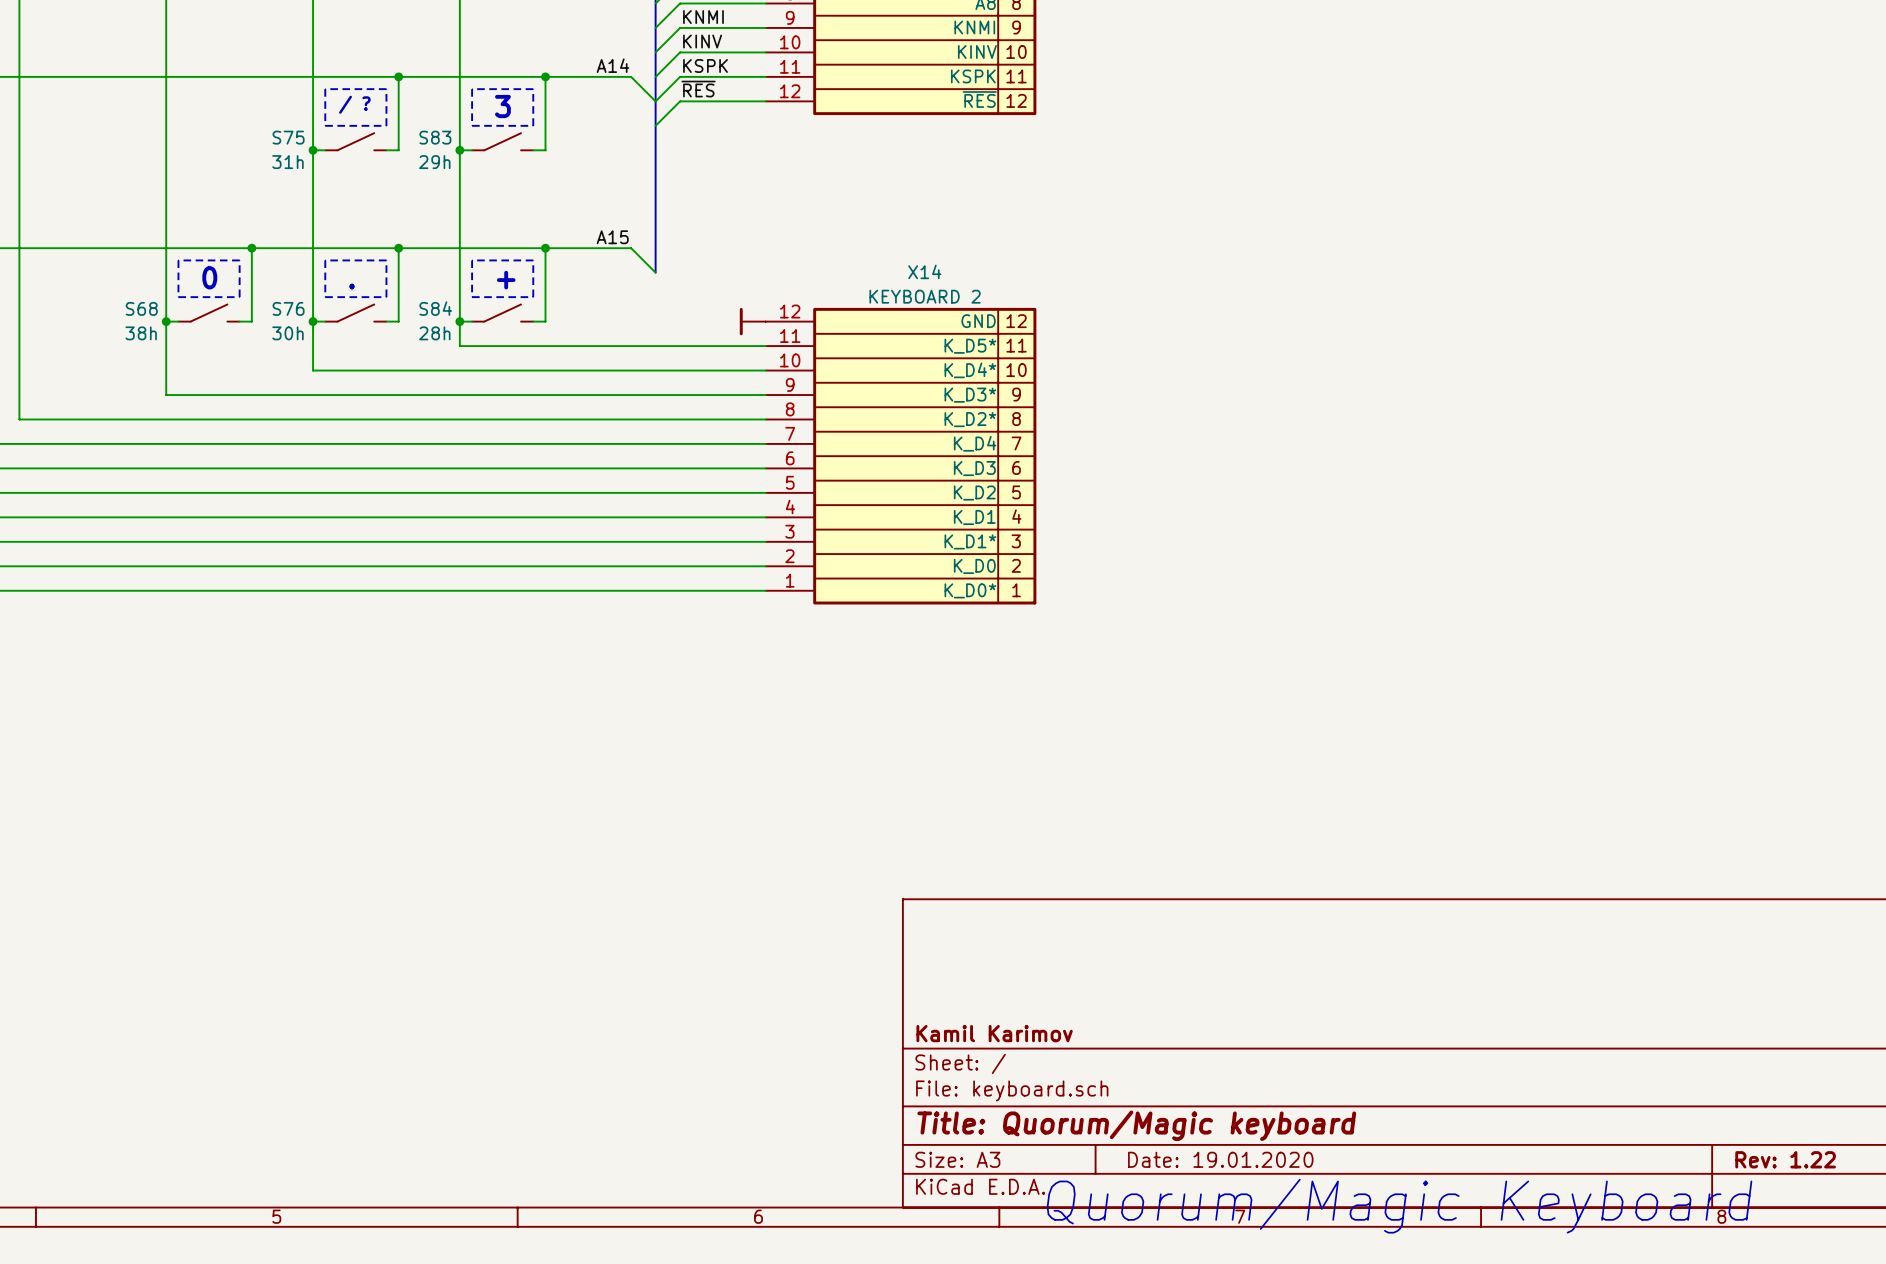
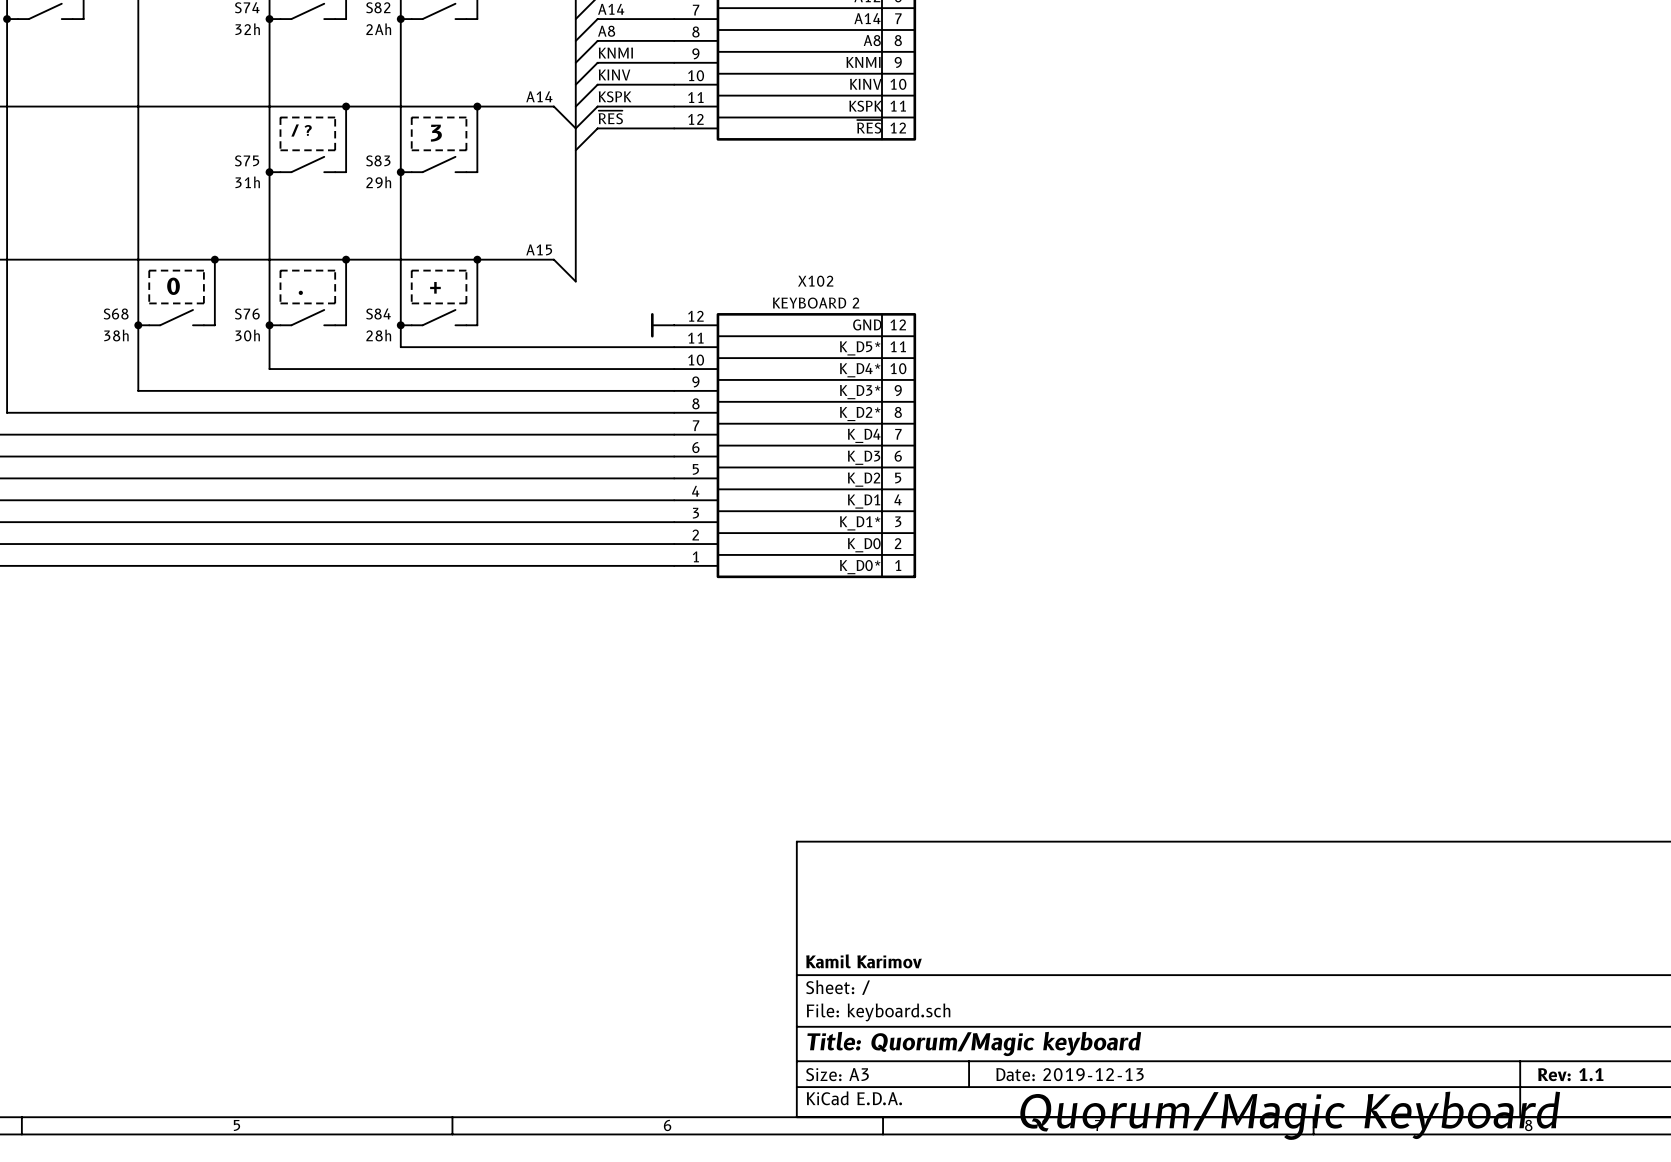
X14 name: X14 (924, 271) -> X102 (815, 281)
title block: Date: 19.01.2020 (1220, 1159) -> Date: 2019-12-13 (1070, 1074)
title block: Rev: 1.22 (1785, 1159) -> Rev: 1.1 (1570, 1074)

